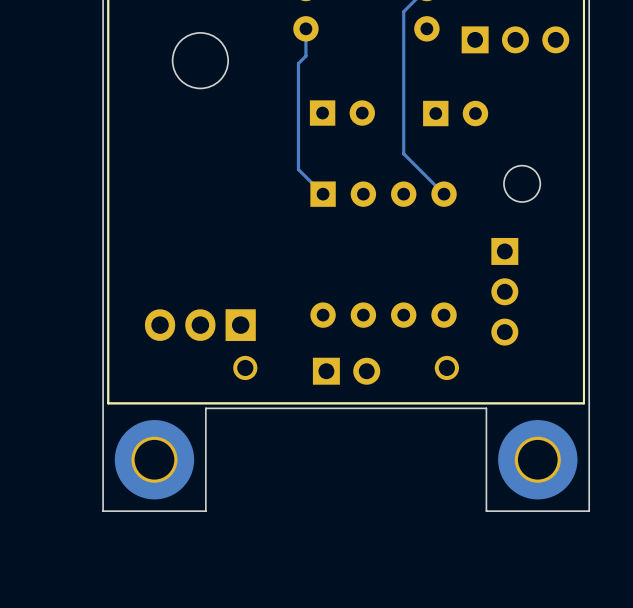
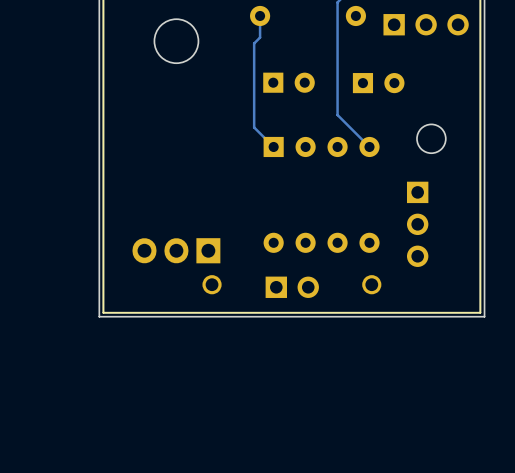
board edge: (205, 408) (205, 511) (103, 511) (103, 408) -> (180, 316) (99, 316)
board edge: (589, 408) (589, 511) (486, 511) (486, 408) -> (484, 316) (403, 316)
part: (154, 459) -> none
part: (537, 459) -> none

